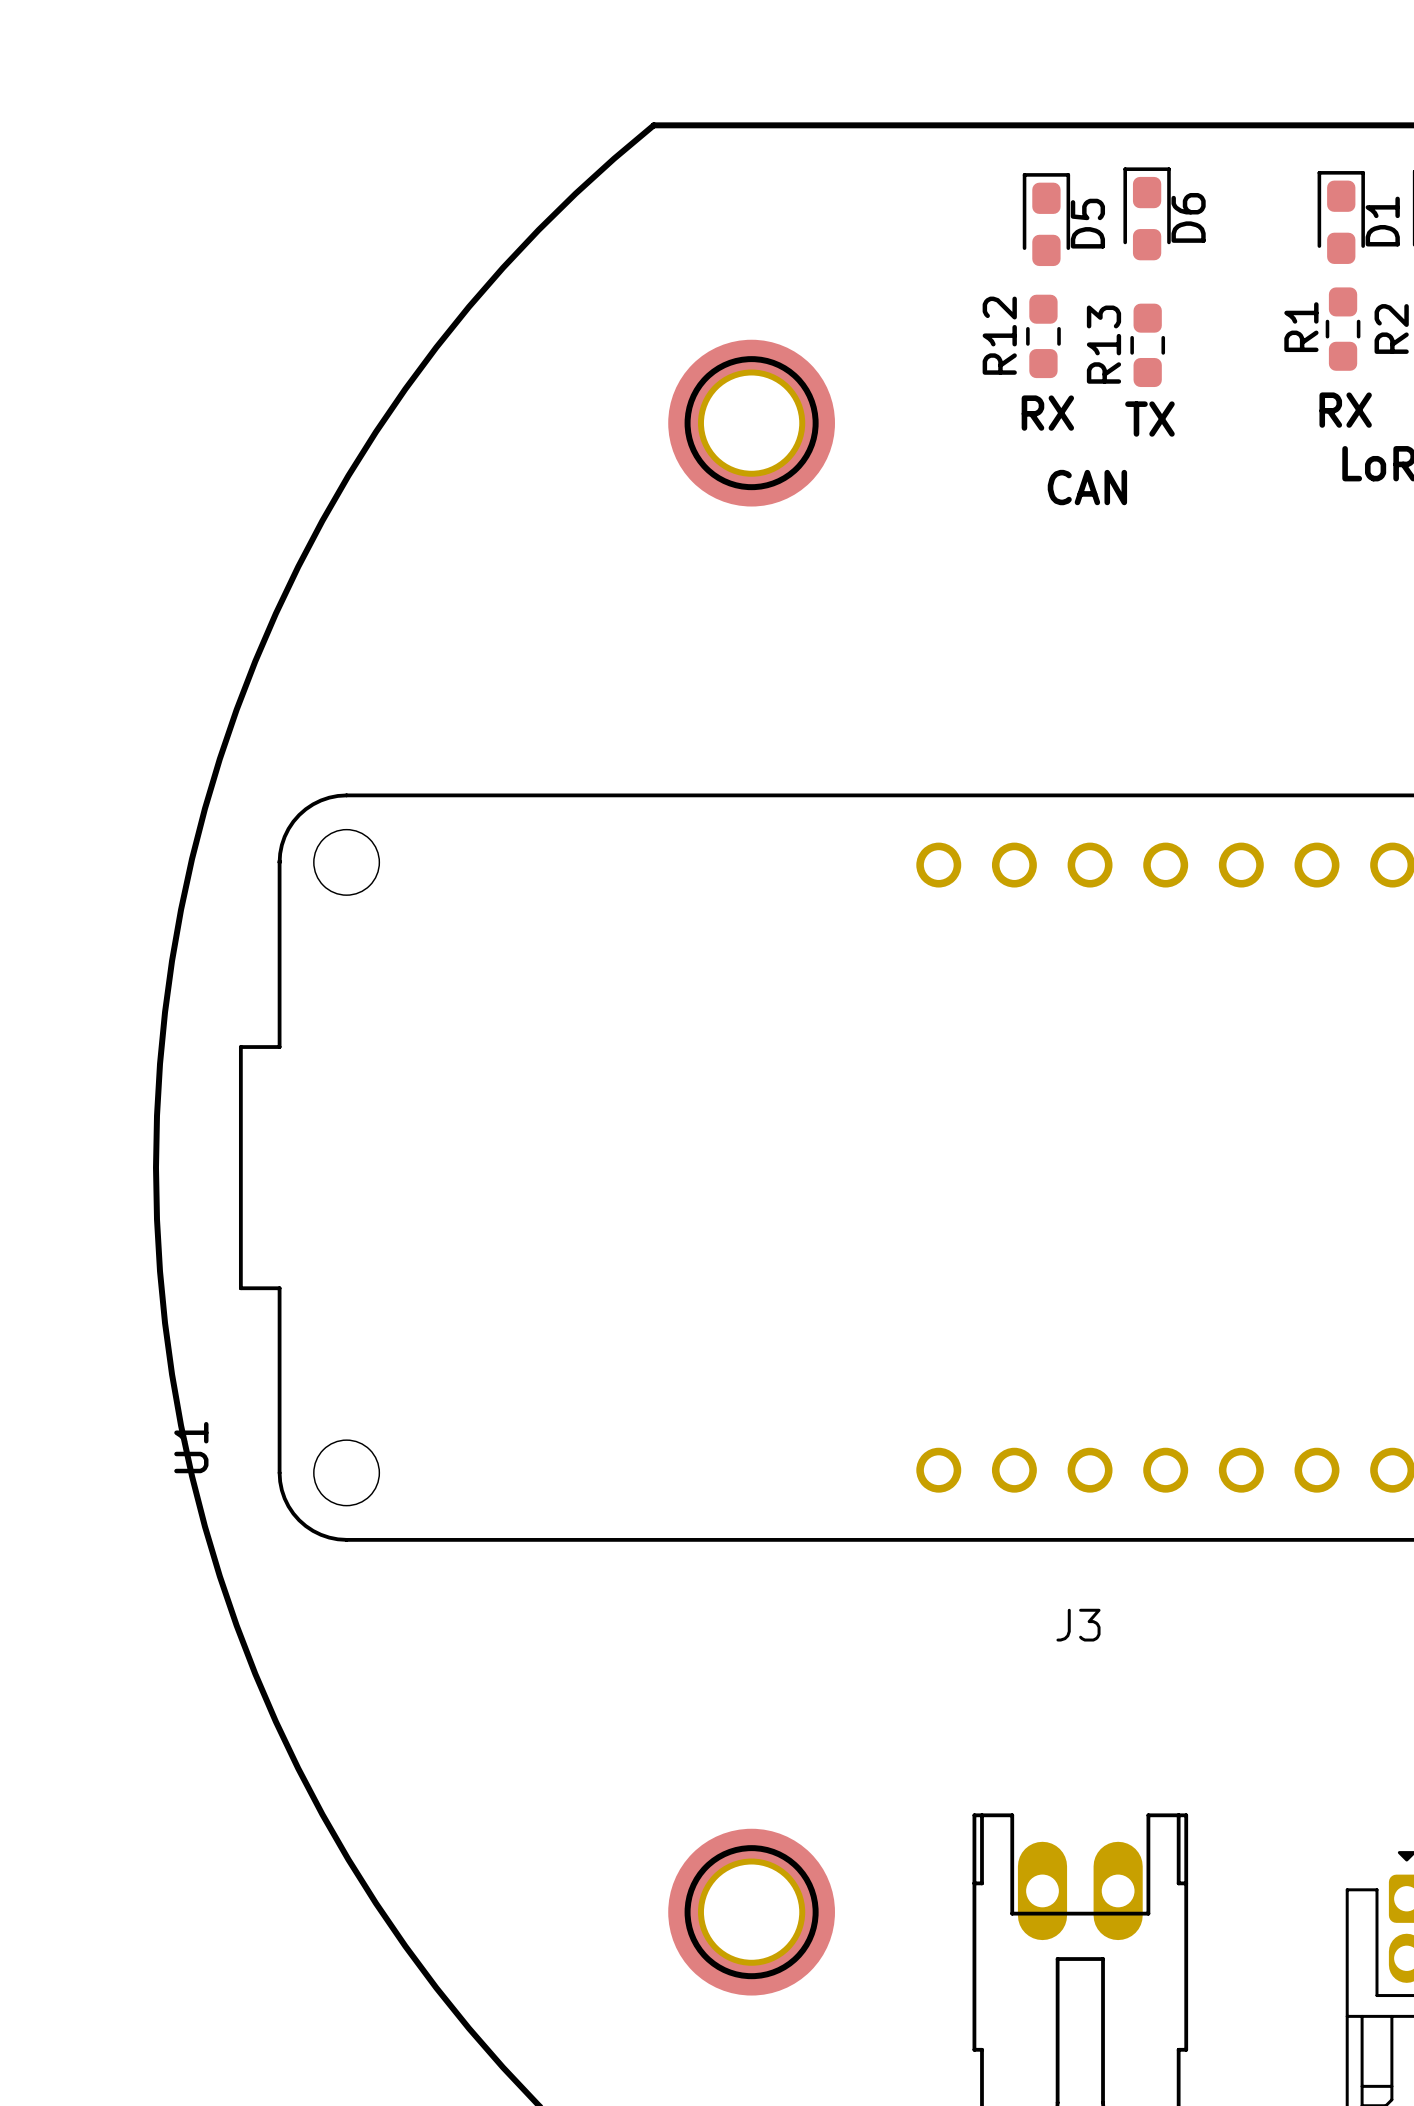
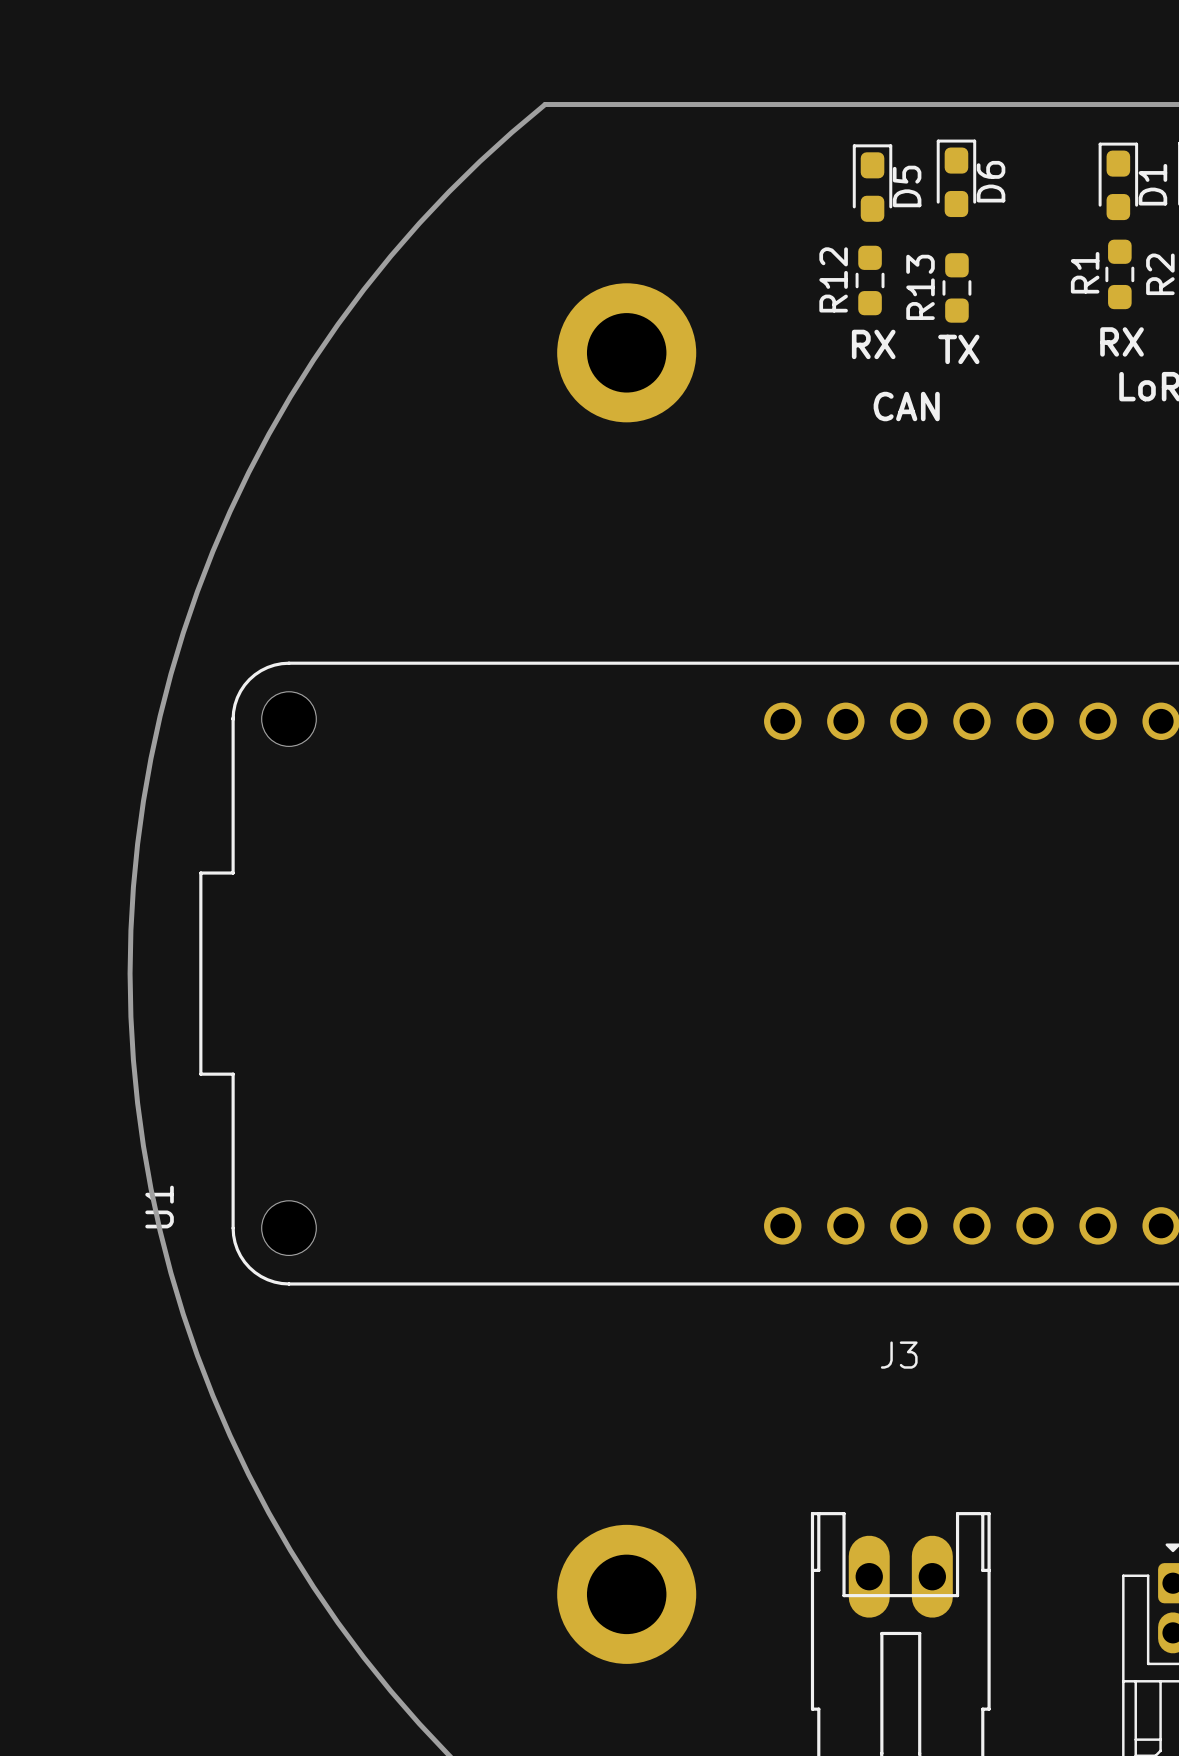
round board edge: [684, 356, 819, 491] -> none
round board edge: [684, 1845, 819, 1980] -> none

